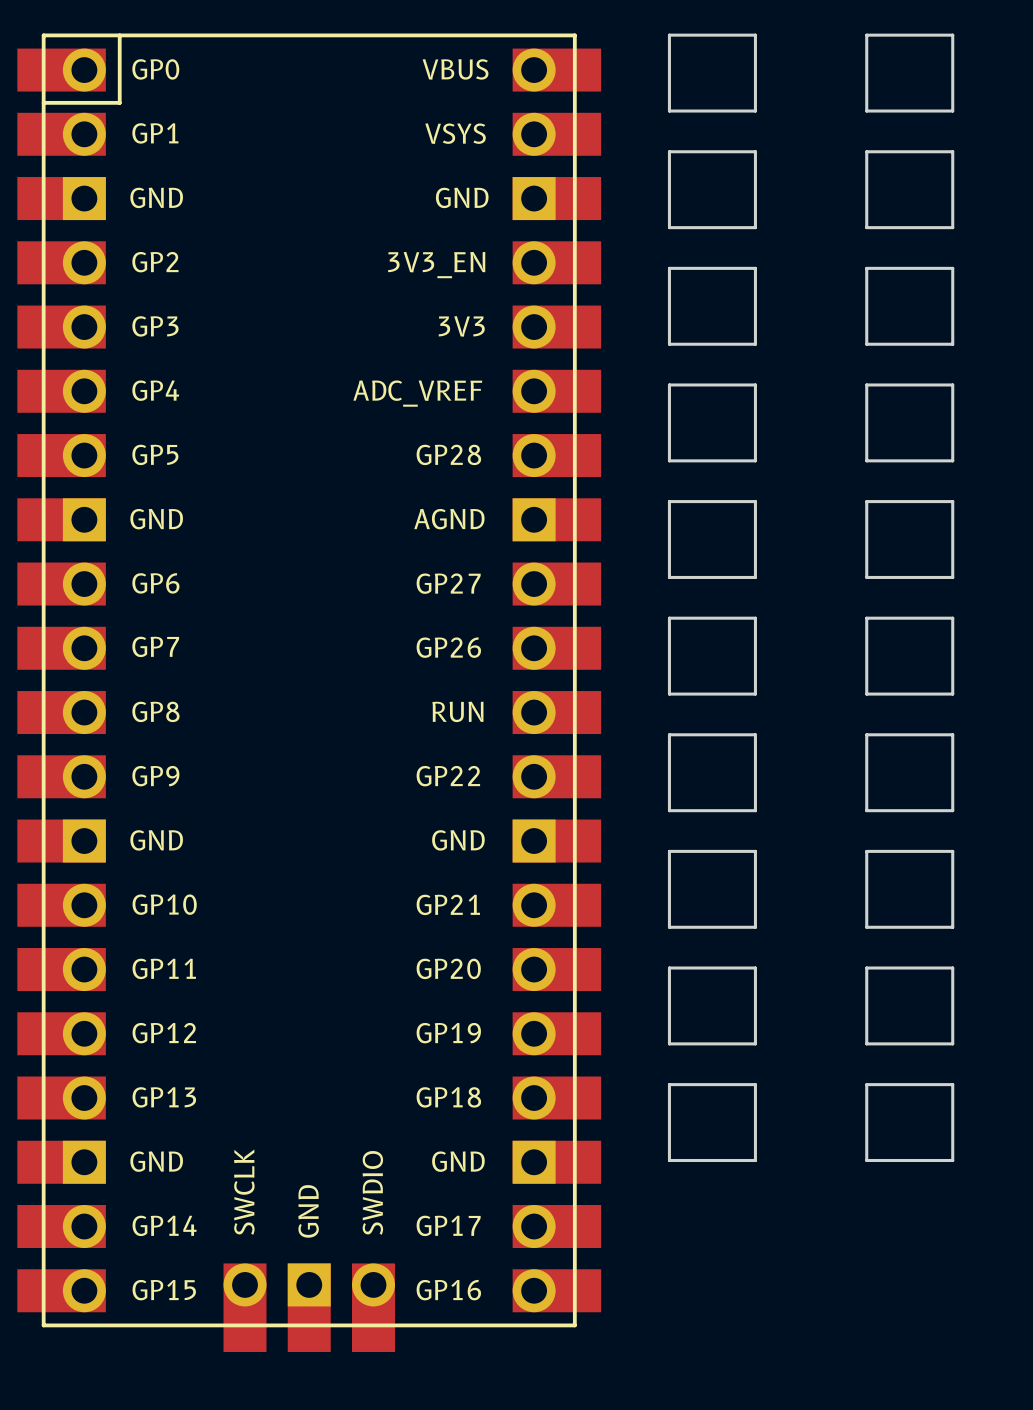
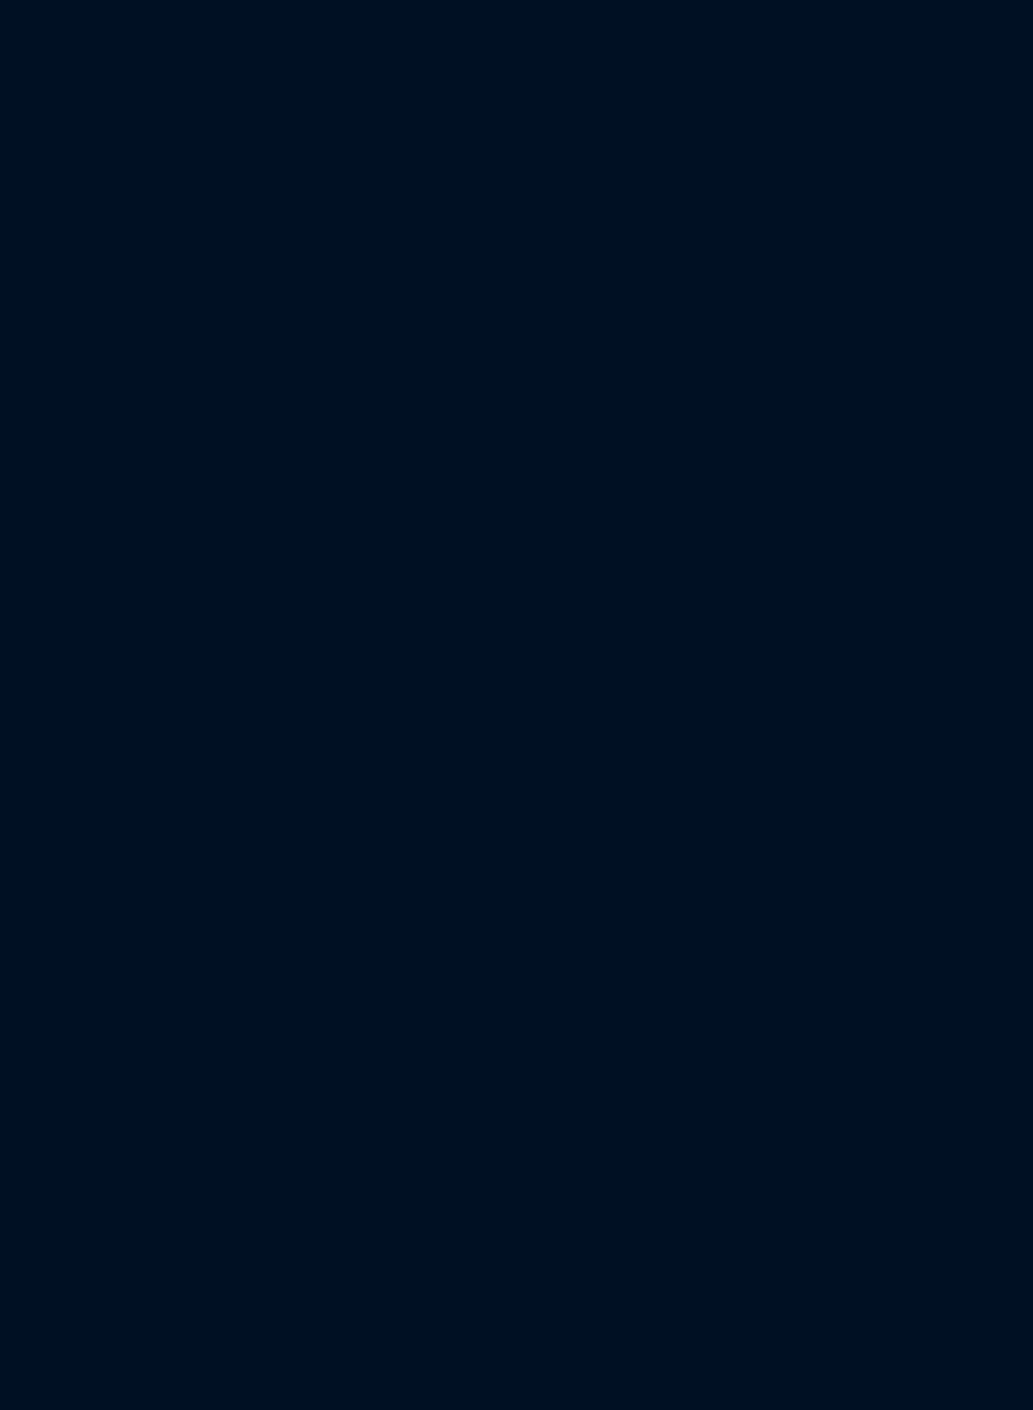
part: (712, 73) -> none
part: (909, 73) -> none
part: (712, 189) -> none
part: (909, 189) -> none
part: (712, 306) -> none
part: (909, 306) -> none
part: (712, 422) -> none
part: (909, 422) -> none
part: (712, 539) -> none
part: (909, 539) -> none
part: (712, 656) -> none
part: (909, 656) -> none
part: (309, 692) -> none
part: (712, 772) -> none
part: (909, 772) -> none
part: (712, 889) -> none
part: (909, 889) -> none
part: (712, 1005) -> none
part: (909, 1005) -> none
part: (712, 1122) -> none
part: (909, 1122) -> none

